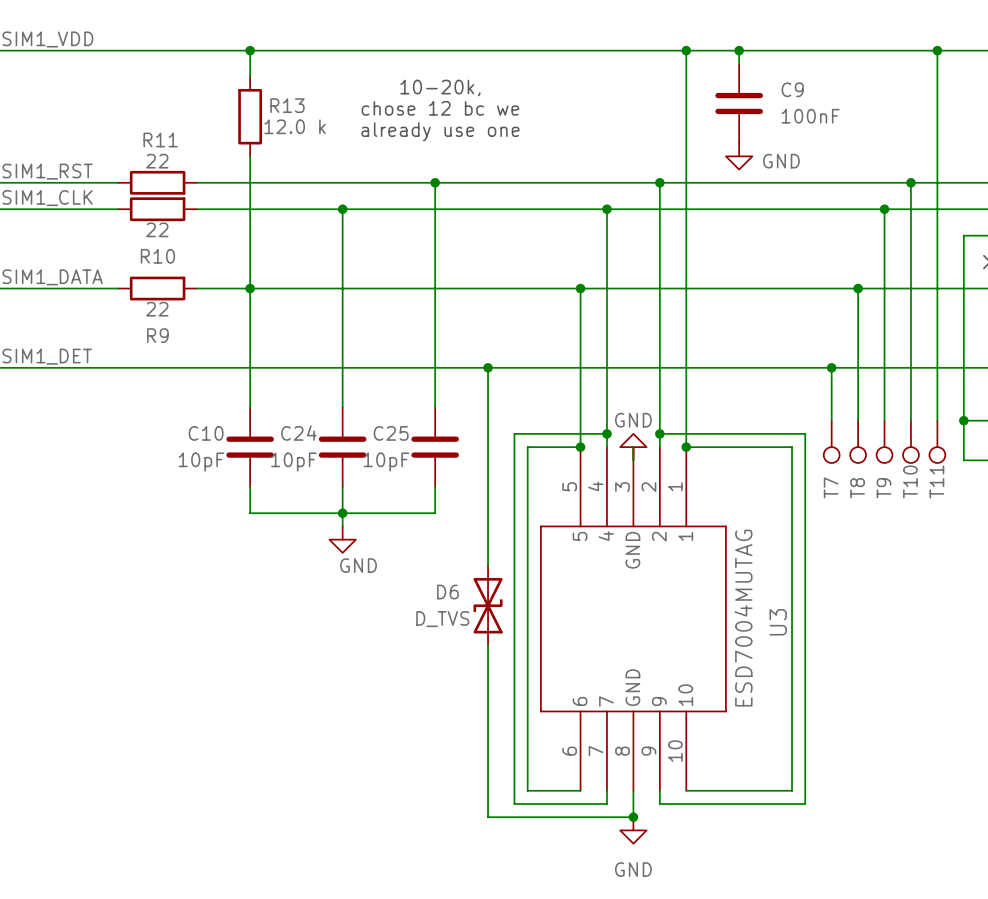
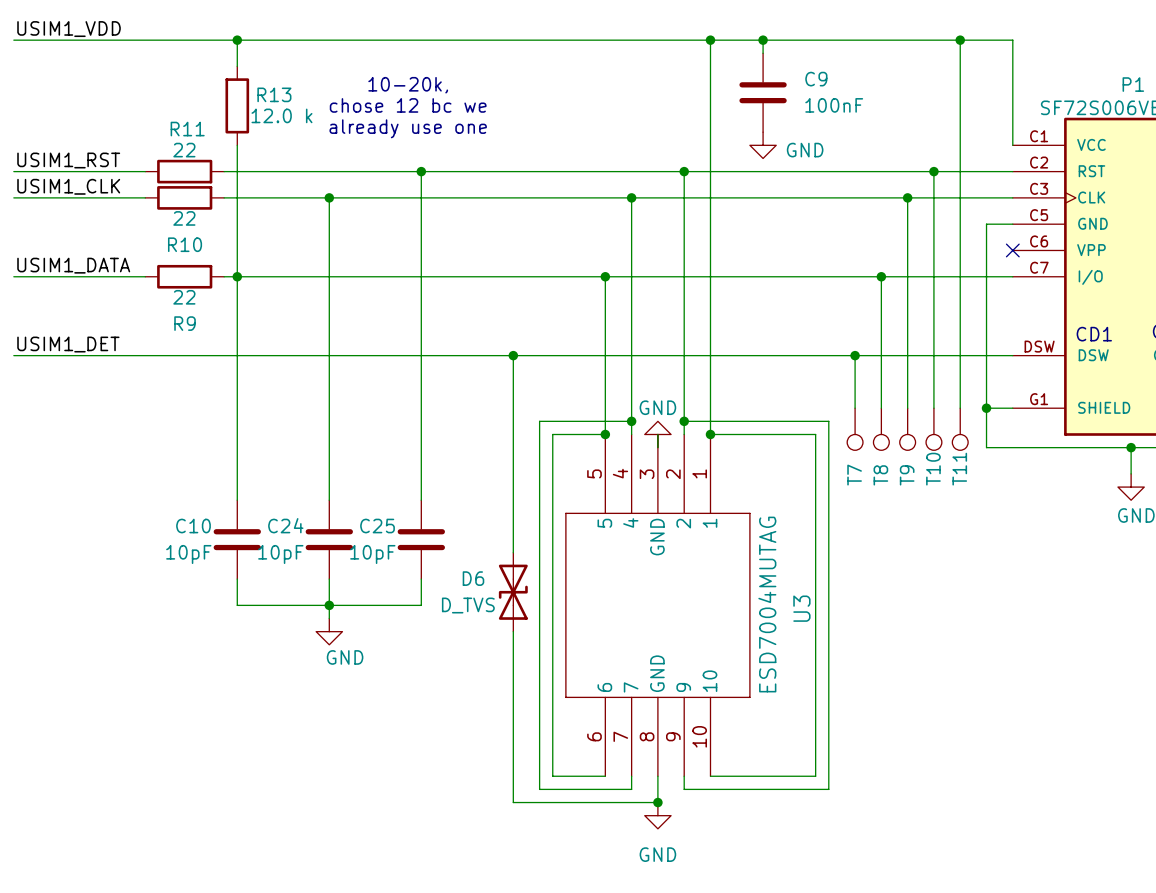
wire: (250, 50) (250, 77) -> (237, 40) (237, 66)
junction position: (250, 50) -> (237, 40)
text position: 10-20k, (440, 88) -> 10-20k, (408, 85)
text position: chose 12 bc we (440, 108) -> chose 12 bc we (408, 105)
R13 position: (250, 116) -> (237, 105)
text position: already use one (440, 131) -> already use one (408, 128)
wire: none -> (237, 145) (237, 500)
wire: (250, 156) (250, 407) -> none
wire: none -> (421, 171) (421, 500)
junction: none -> (421, 171)
wire: (435, 182) (435, 407) -> none
junction: (435, 182) -> none
wire: none -> (329, 197) (329, 500)
junction: none -> (329, 197)
wire: (342, 209) (342, 407) -> none
junction: (342, 209) -> none
junction position: (250, 288) -> (237, 276)
C10 position: (250, 447) -> (237, 539)
C24 position: (342, 447) -> (329, 539)
C25 position: (435, 447) -> (421, 539)
wire: (250, 486) (250, 513) (435, 513) (435, 486) -> (237, 579) (237, 605) (421, 605) (421, 579)
wire: (342, 486) (342, 526) -> (329, 579) (329, 618)
junction: (342, 513) -> none
power symbol position: GND (342, 539) -> GND (329, 631)
junction: none -> (329, 605)

